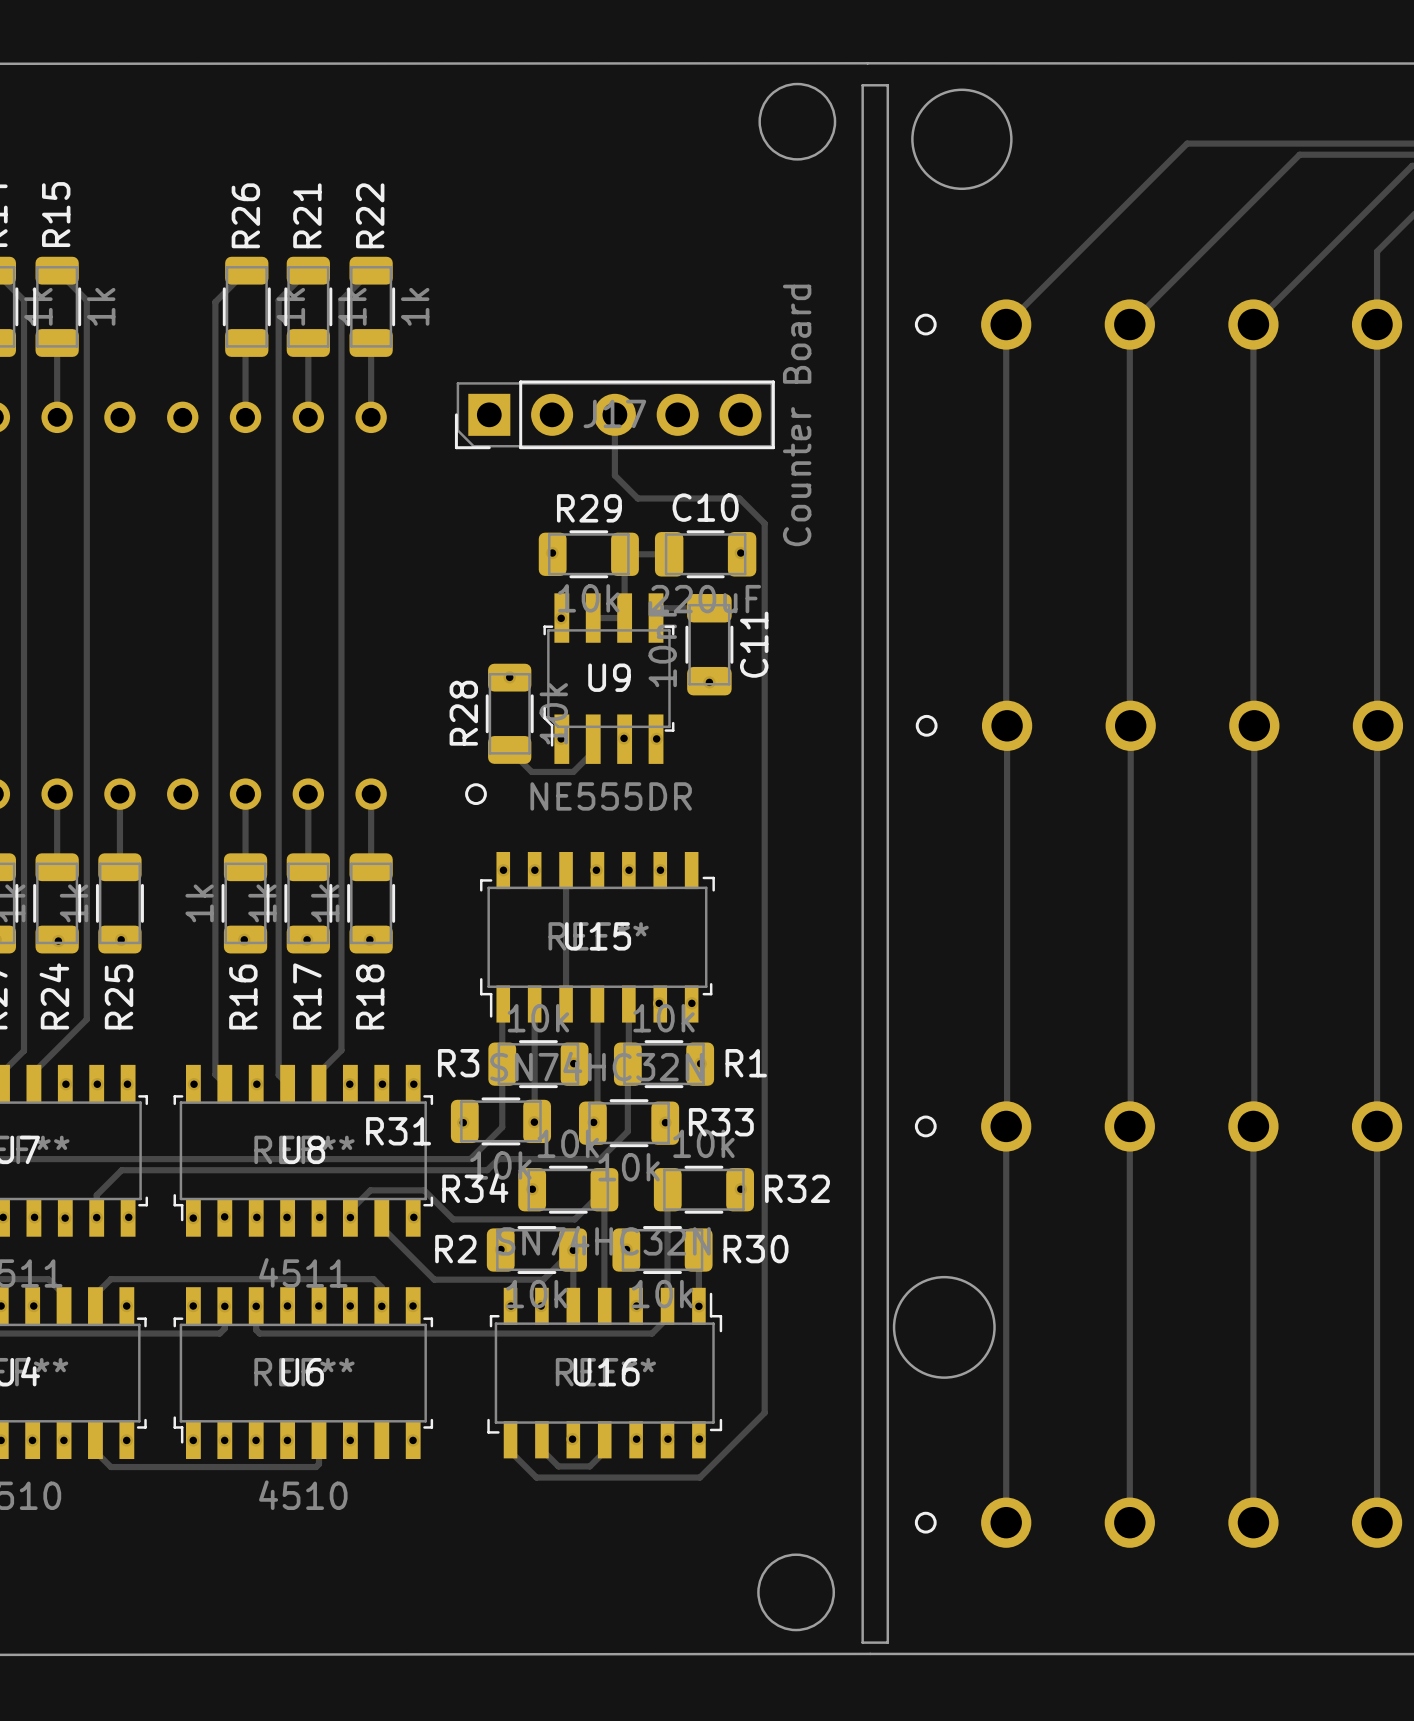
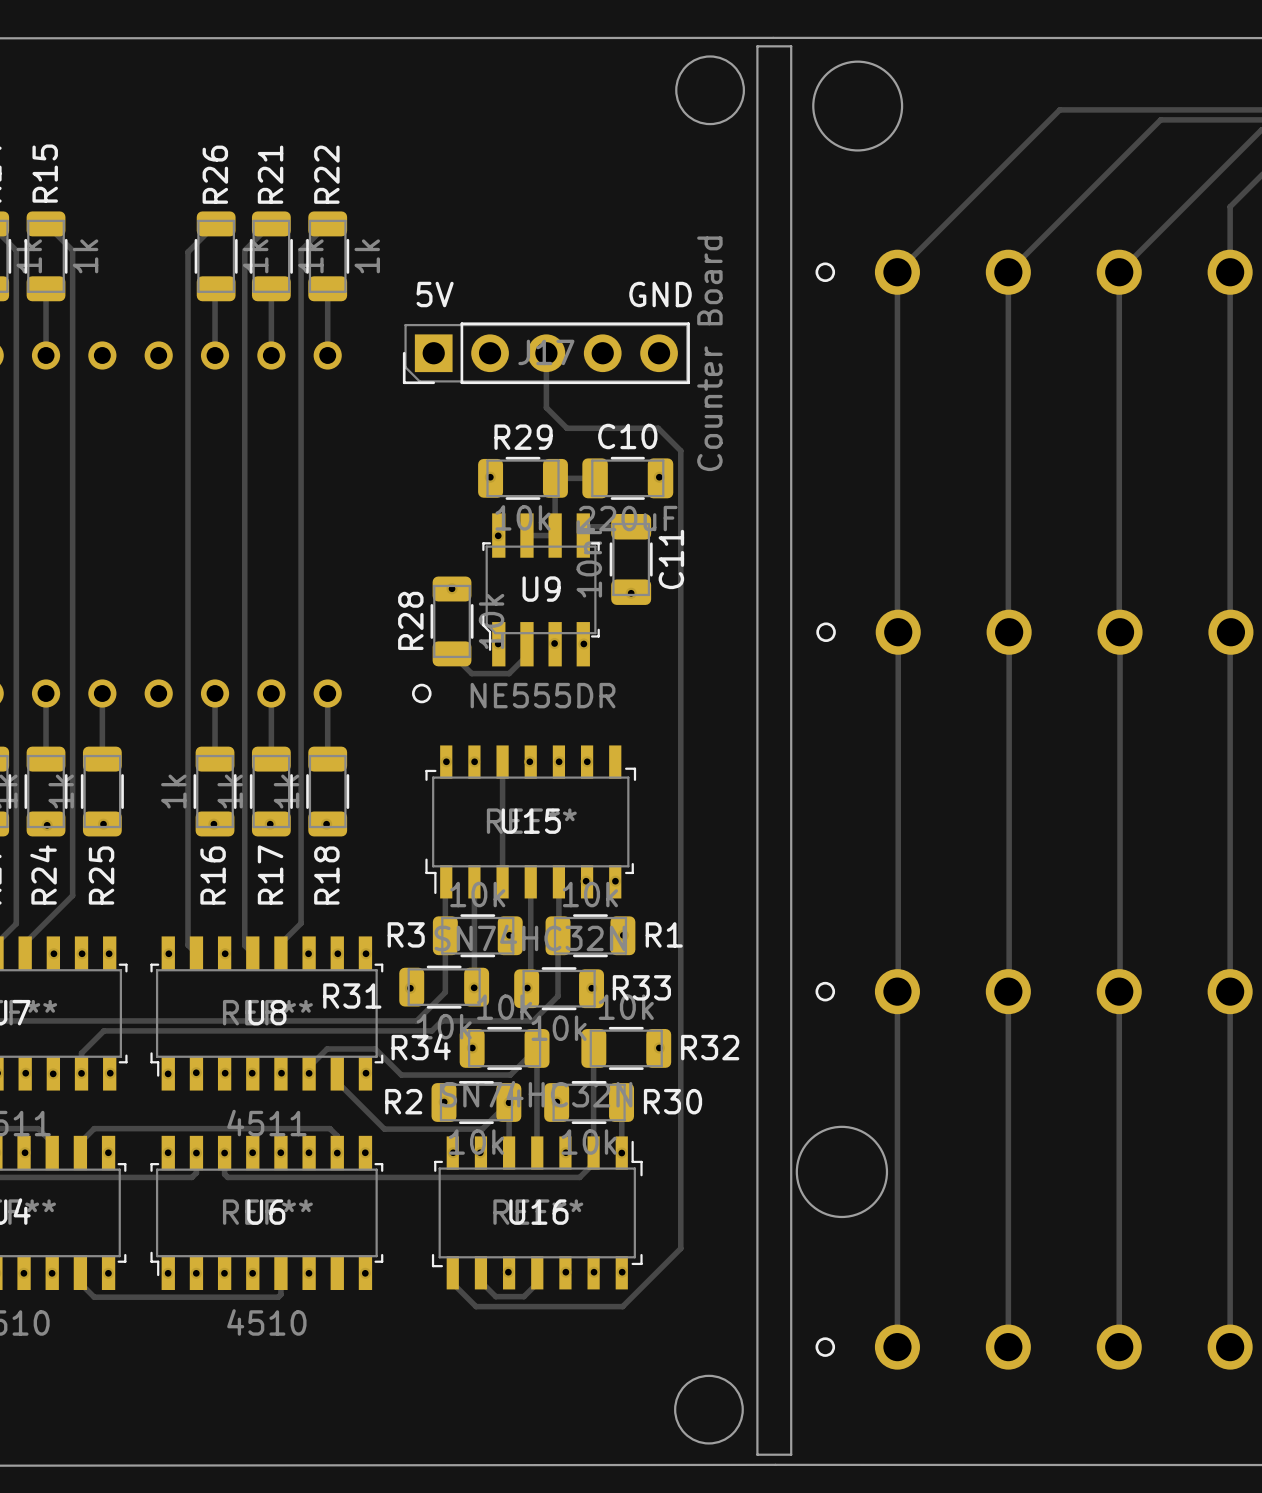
board edge: (887, 85) (862, 85) (862, 1642) -> (791, 57) (791, 46) (757, 46) (757, 1454) (768, 1454)
text: none -> 5V (435, 294)
text: none -> GND (660, 294)

